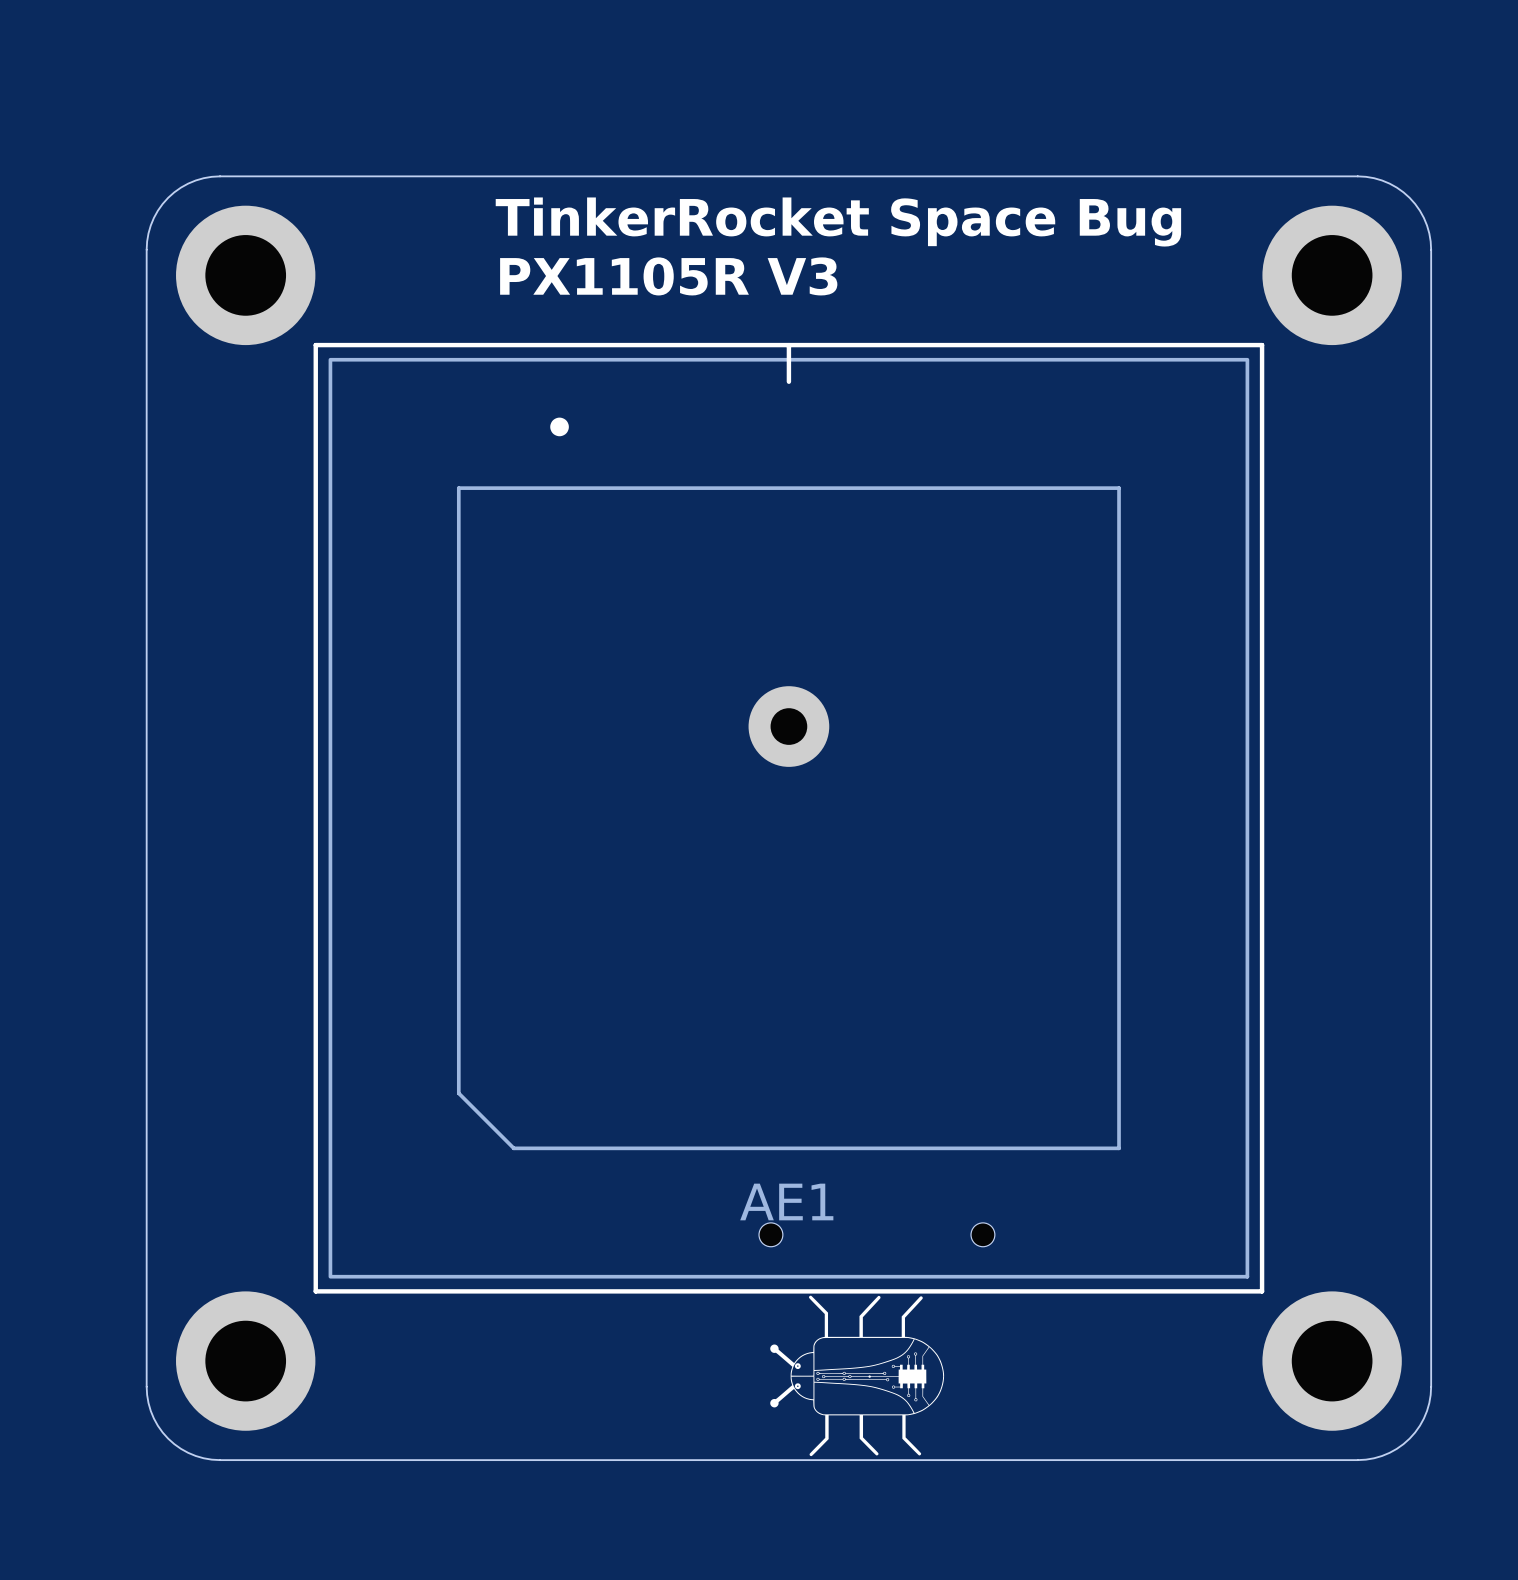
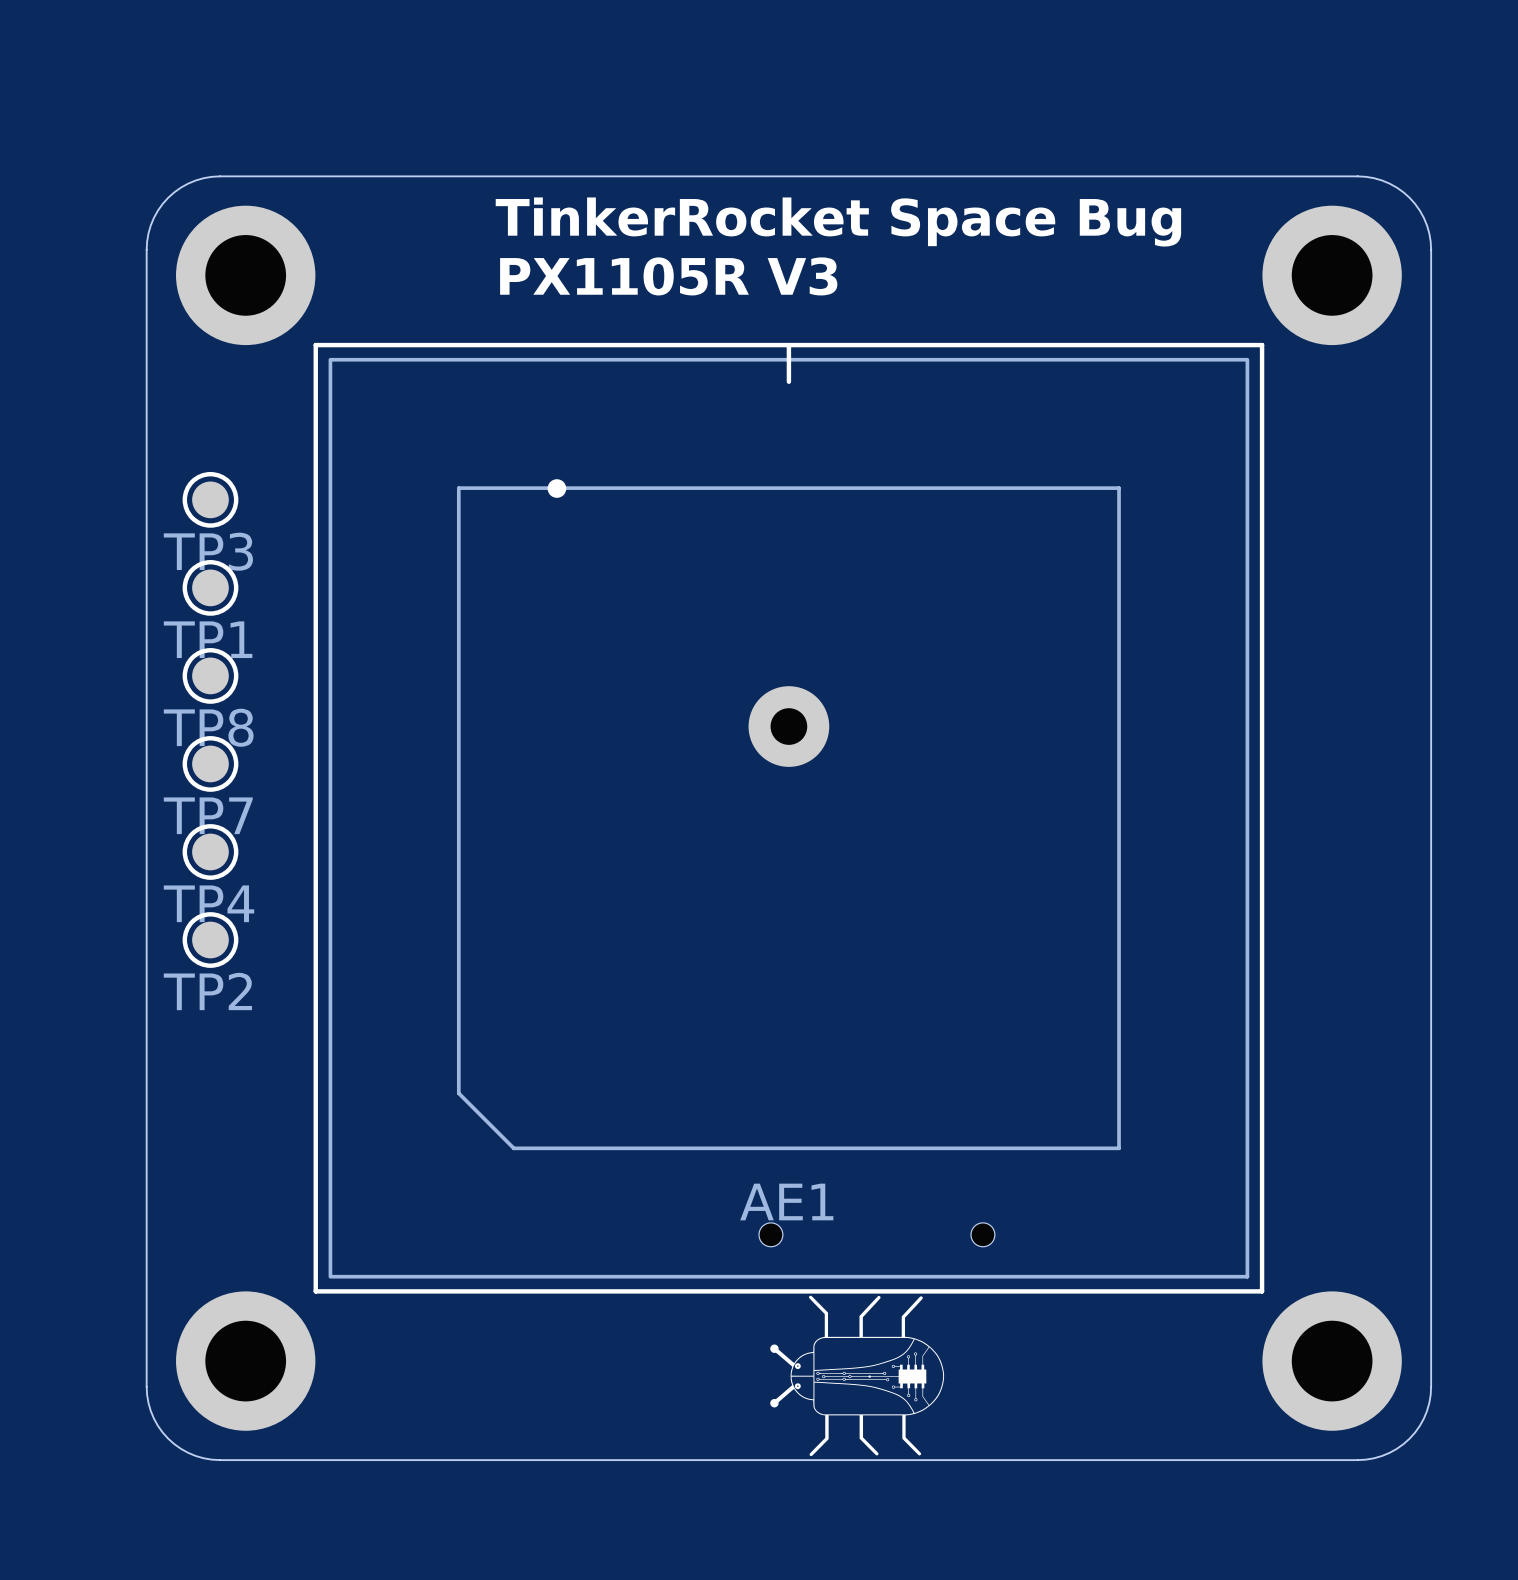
part position: (559, 426) -> (556, 488)
TP3: none -> (210, 499)
TP1: none -> (210, 587)
TP8: none -> (210, 675)
TP7: none -> (210, 763)
TP4: none -> (210, 851)
TP2: none -> (210, 940)

